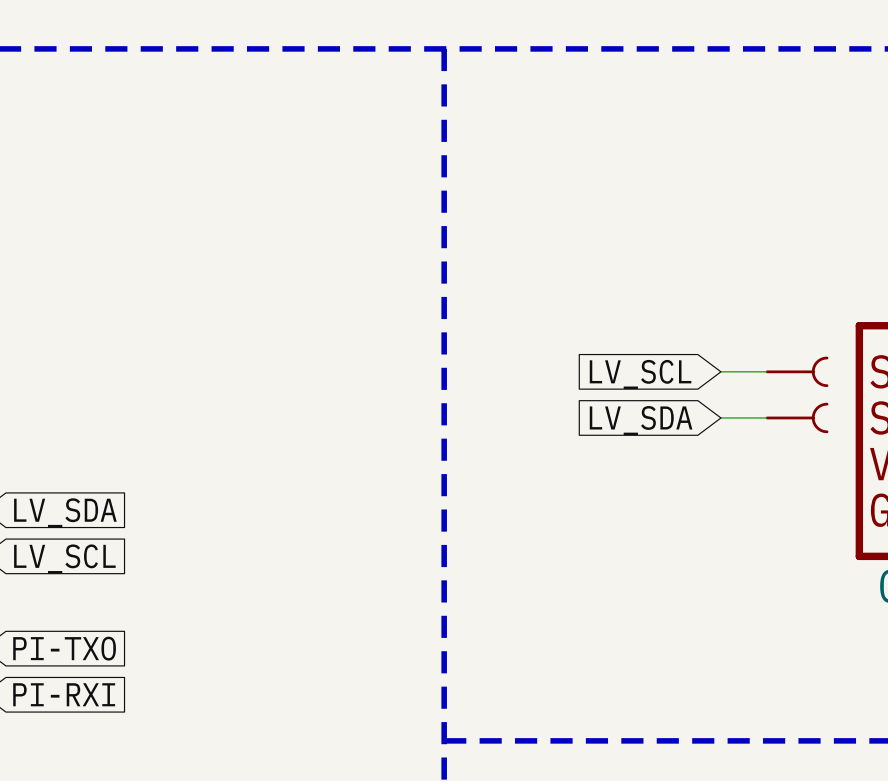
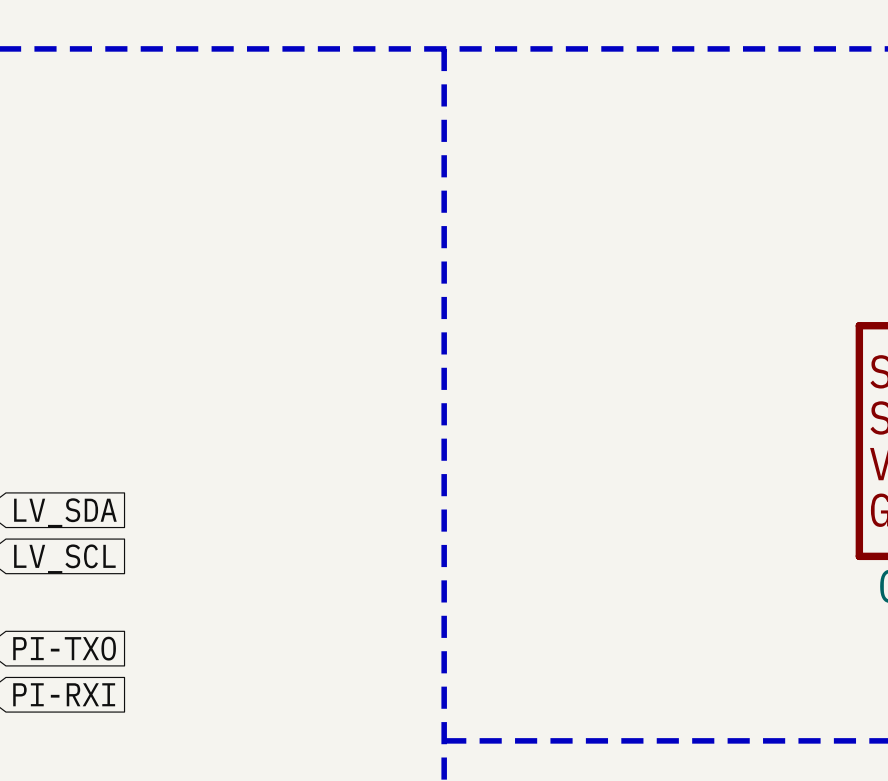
wire: (720, 371) (767, 371) -> none
part: (797, 371) -> none
global label: LV_SCL (640, 374) -> none
wire: (720, 417) (767, 417) -> none
part: (797, 417) -> none
global label: LV_SDA (641, 420) -> none

